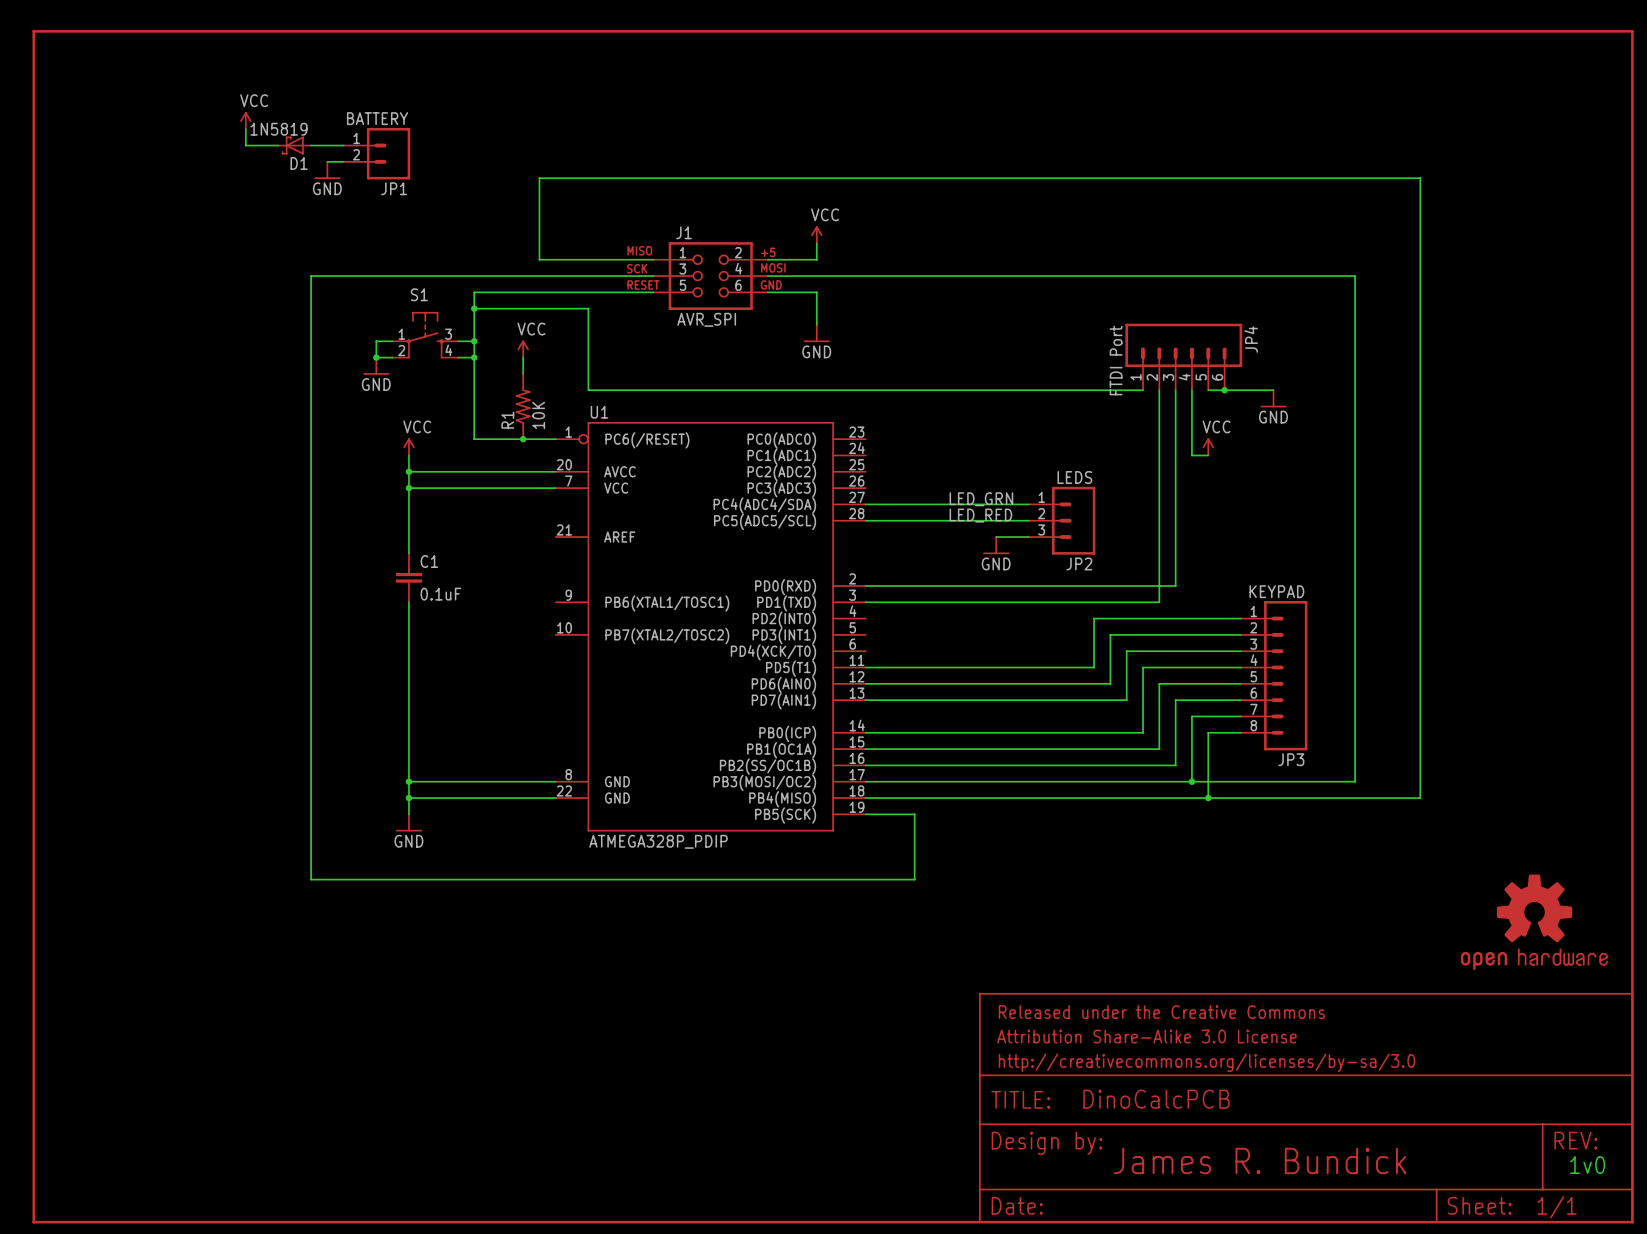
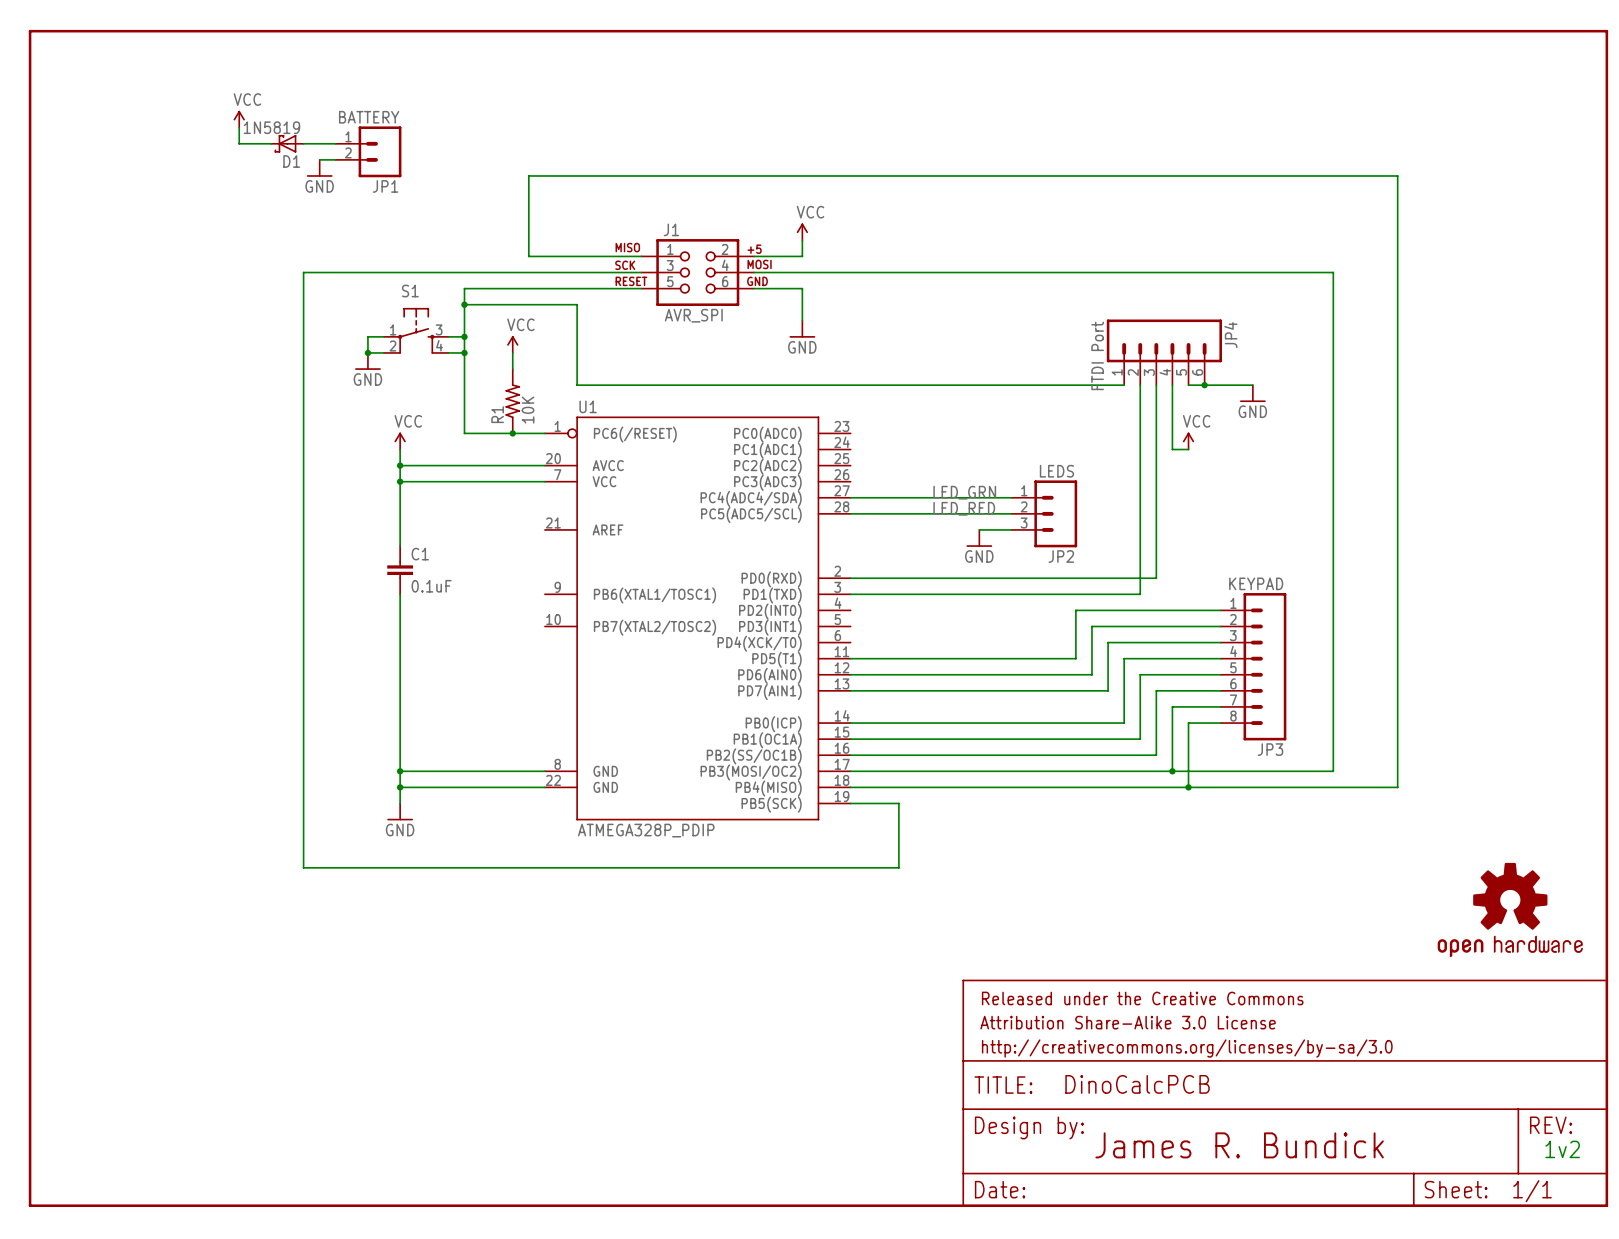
text: 1v0 (1587, 1165) -> 1v2 (1562, 1149)

